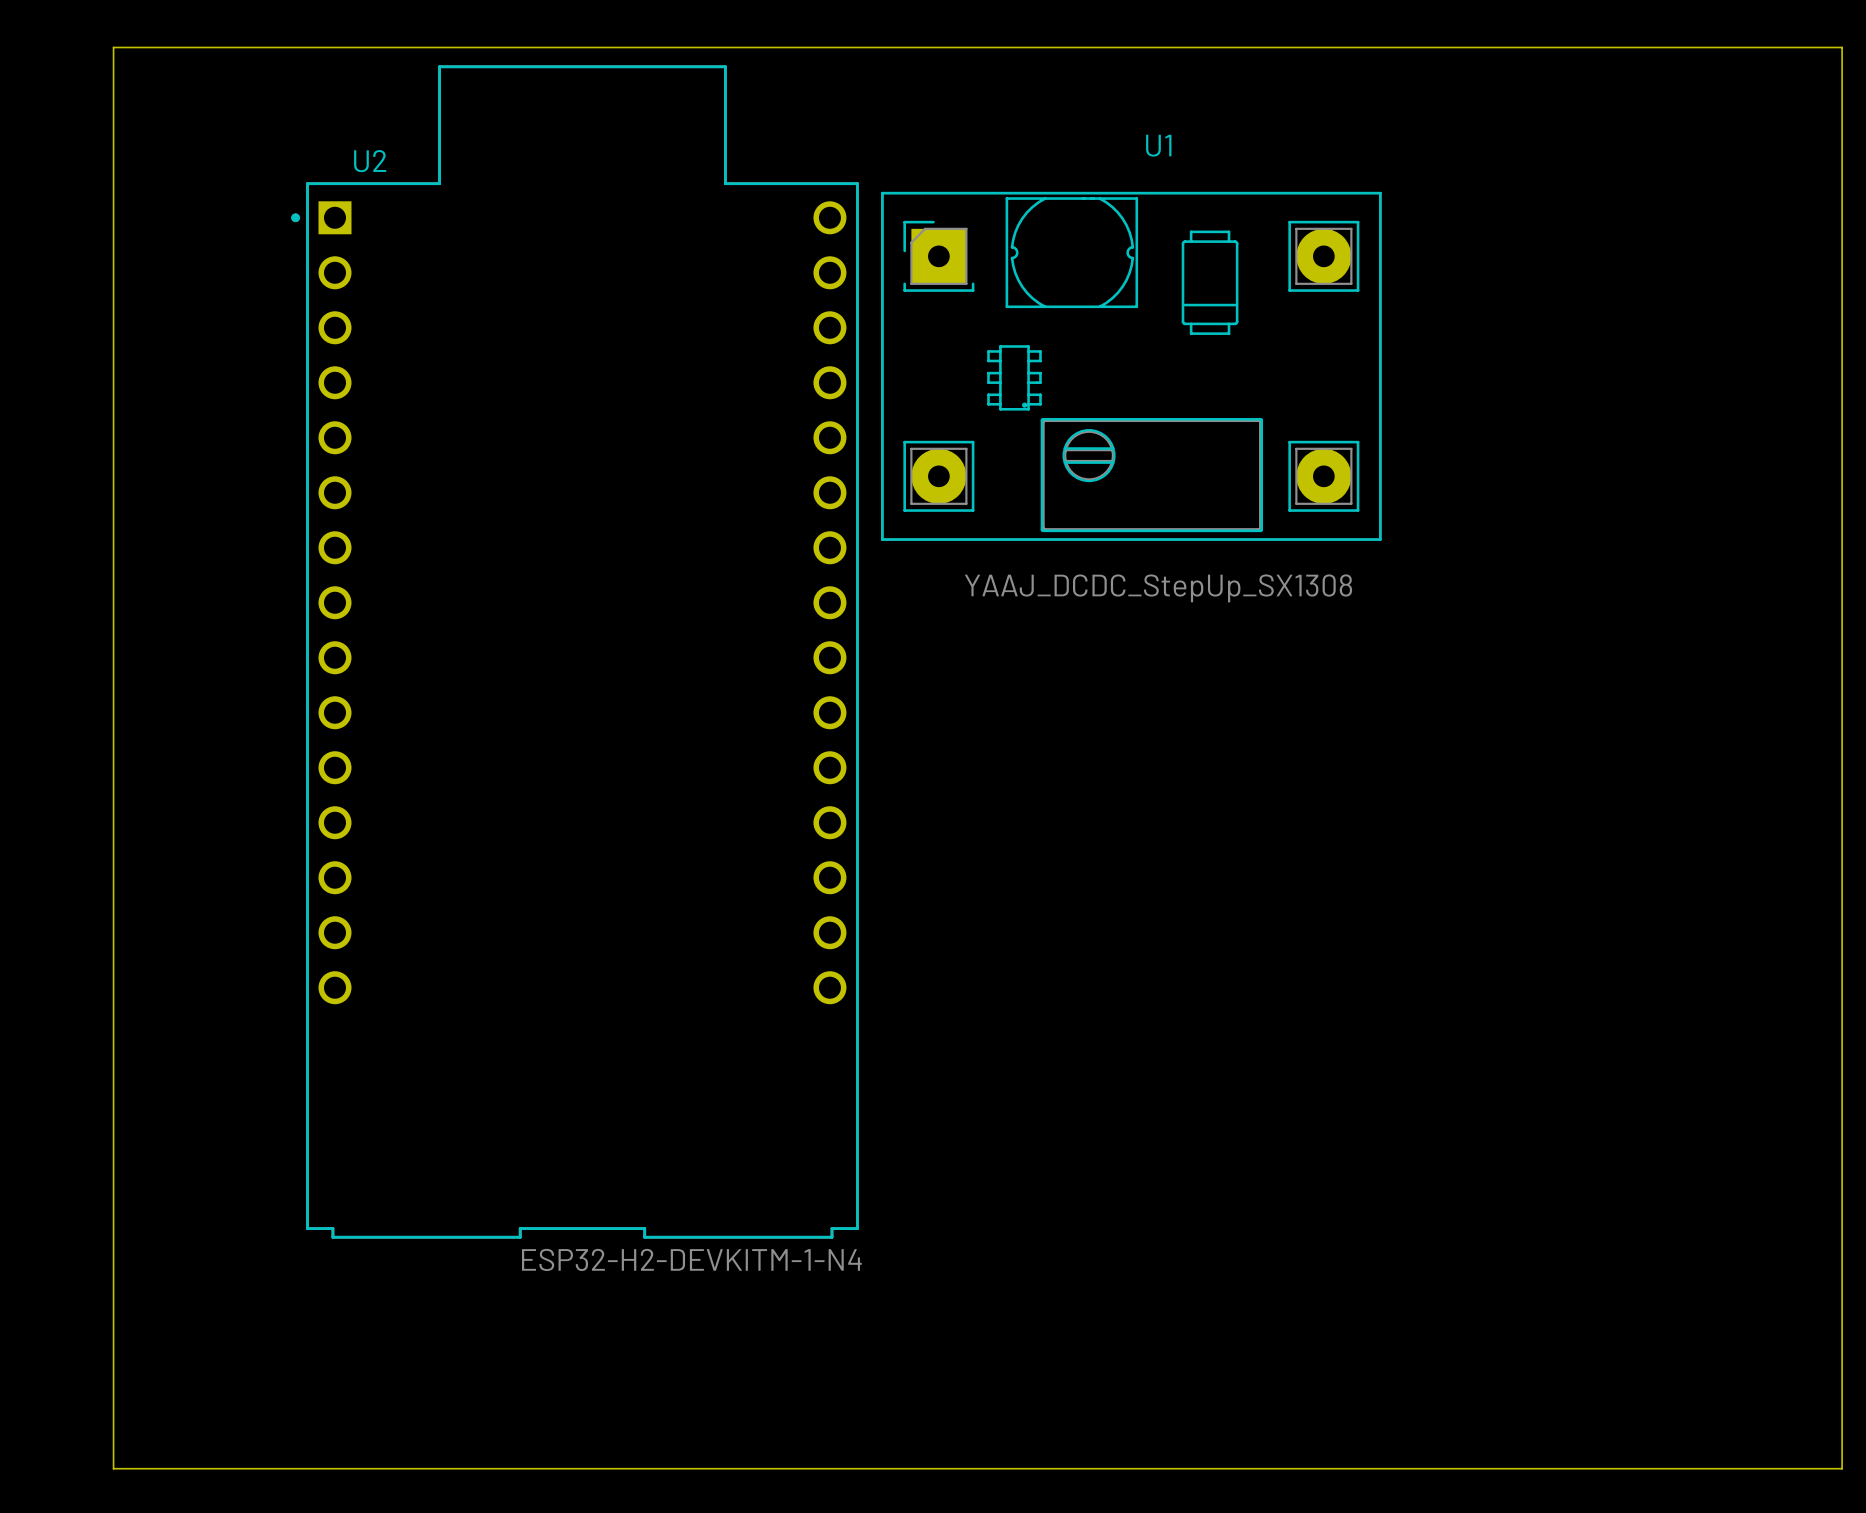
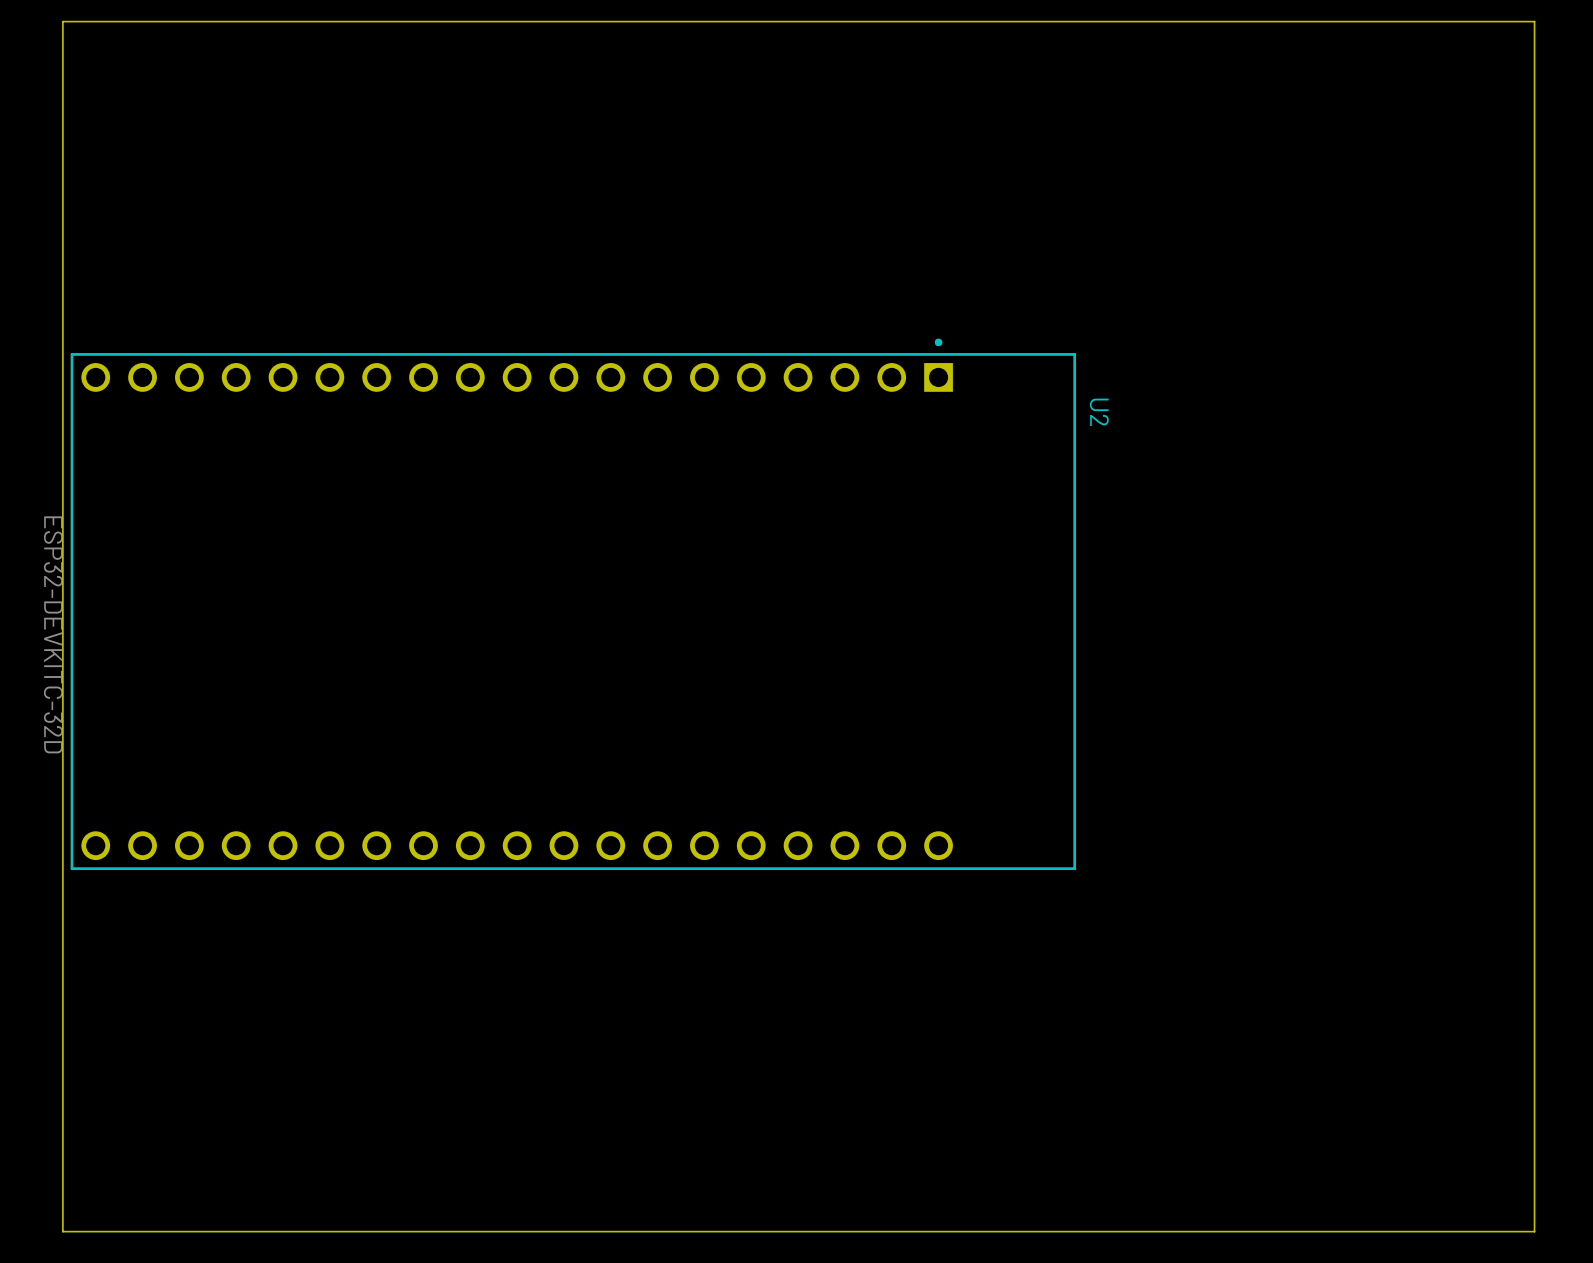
U2 footprint: [291, 65, 859, 1239] -> [70, 338, 1076, 870]
U2 name position: U2 (370, 161) -> U2 (1099, 412)
U1: YAAJ_DCDC_StepUp_SX1308 (1131, 366) -> none
U2 value: ESP32-H2-DEVKITM-1-N4 (691, 1259) -> ESP32-DEVKITC-32D (53, 634)

